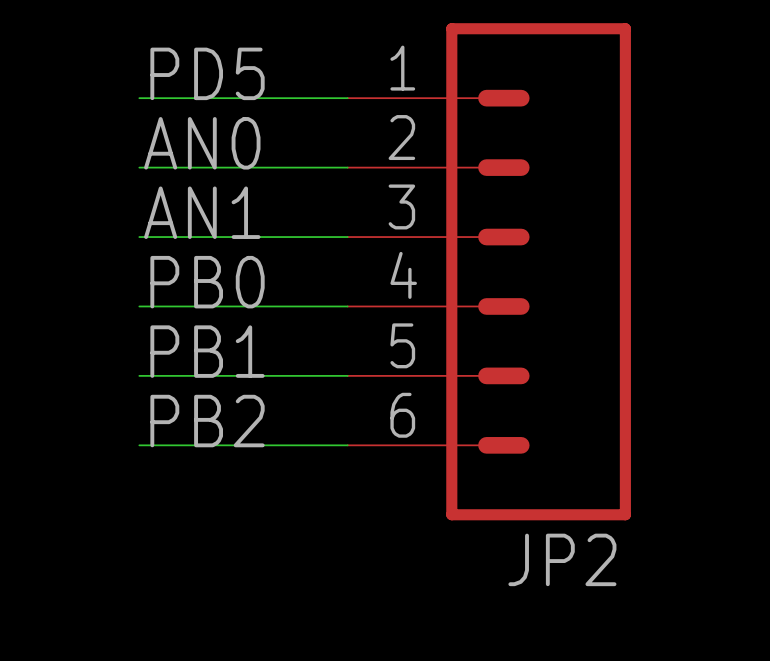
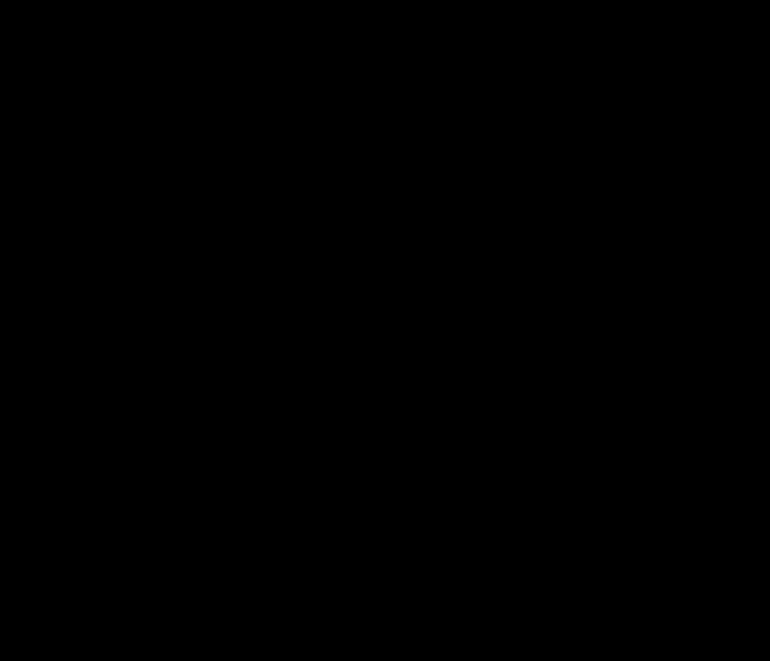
label: PD5 (207, 73) -> none
wire: (139, 98) (347, 98) -> none
label: AN0 (202, 143) -> none
wire: (139, 167) (347, 167) -> none
label: AN1 (202, 212) -> none
wire: (139, 237) (347, 237) -> none
JP2: (489, 271) -> none
label: PB0 (207, 282) -> none
wire: (139, 306) (347, 306) -> none
label: PB1 (207, 351) -> none
wire: (139, 375) (347, 375) -> none
label: PB2 (207, 421) -> none
wire: (139, 445) (347, 445) -> none

